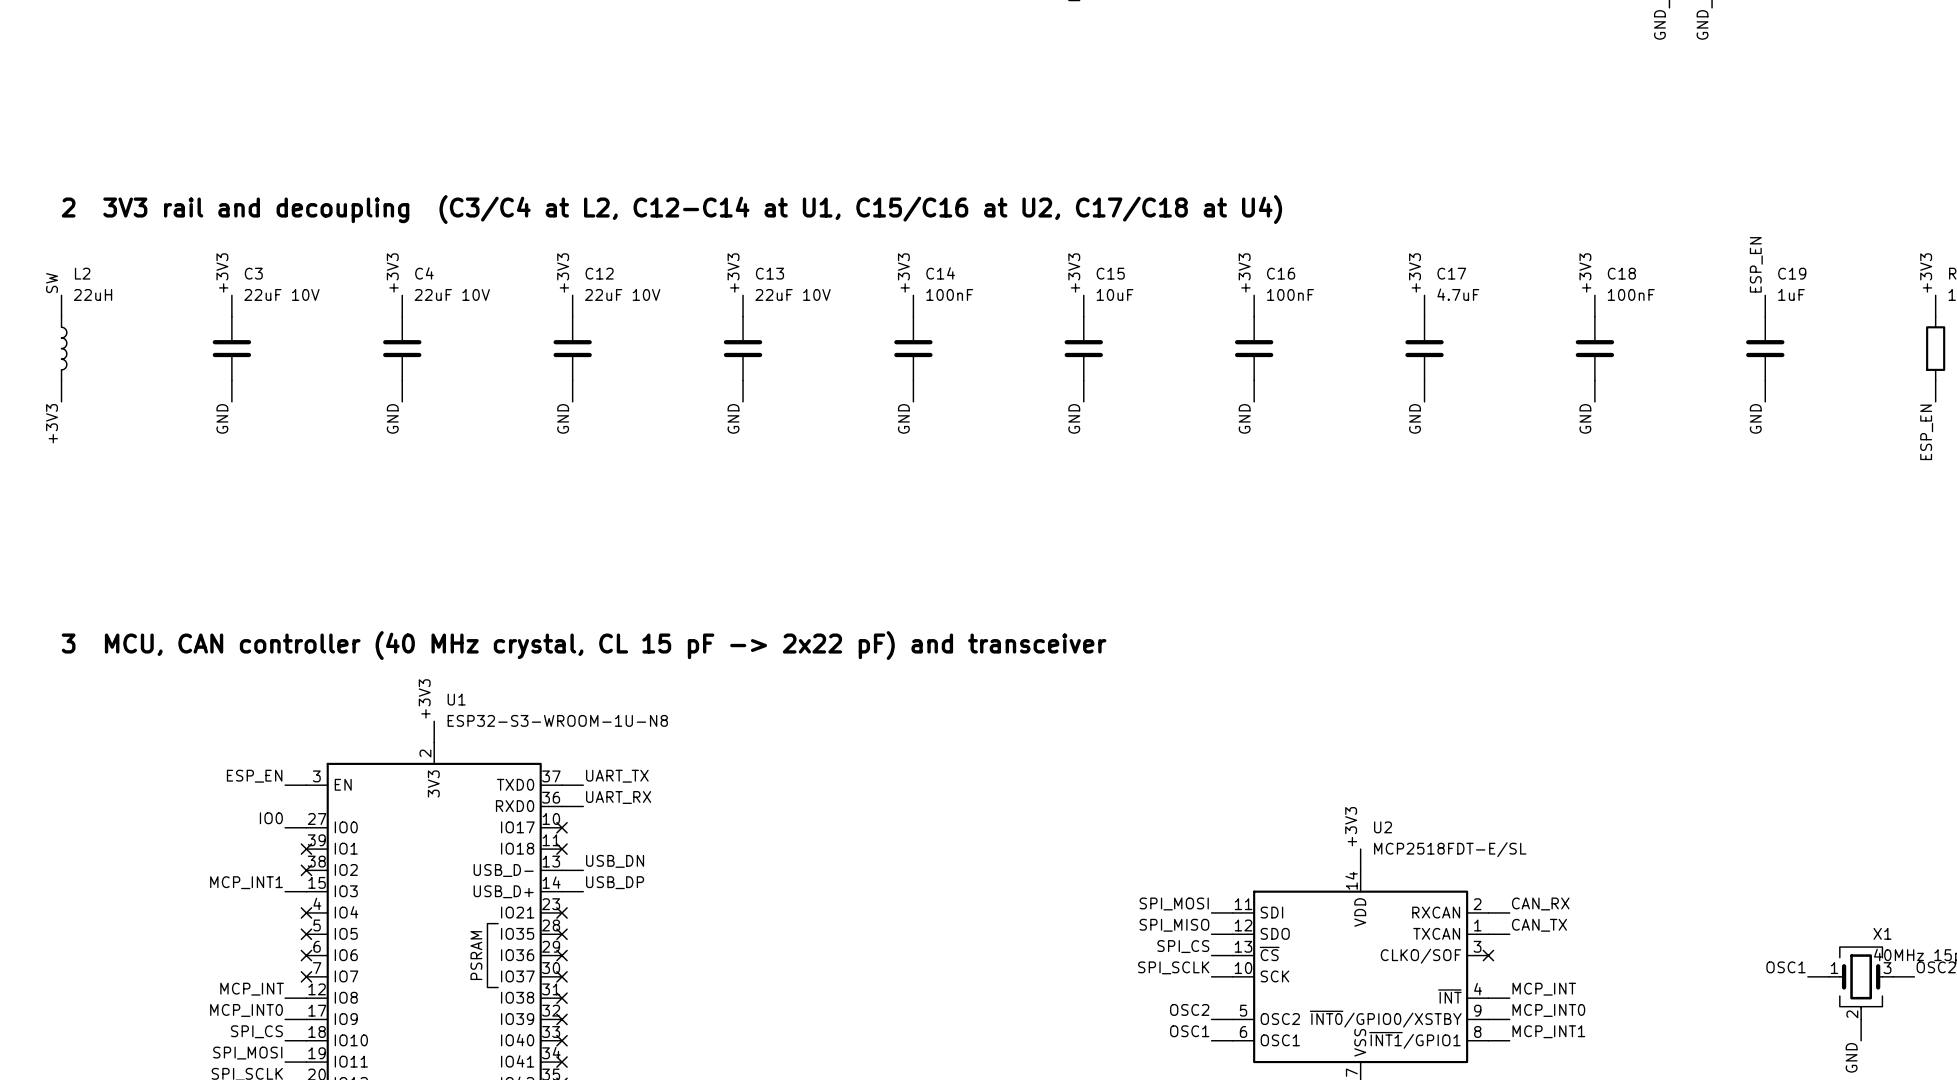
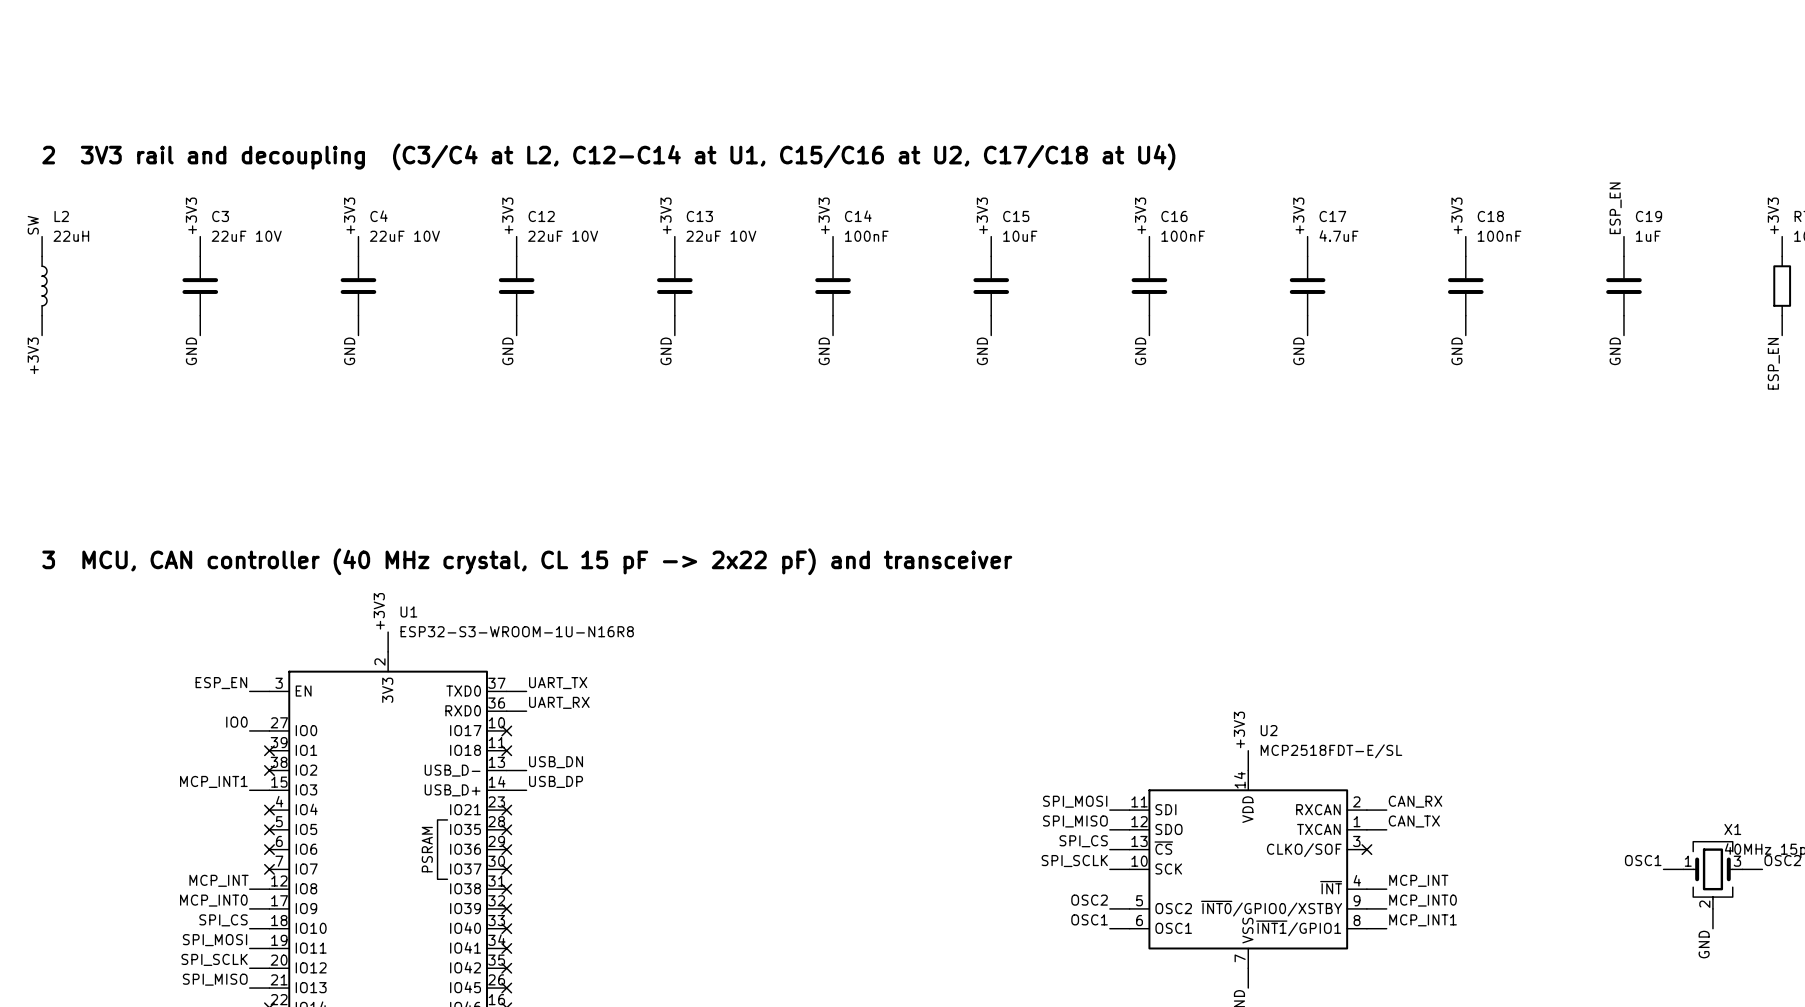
U1 value: ESP32-S3-WROOM-1U-N8 (557, 720) -> ESP32-S3-WROOM-1U-N16R8 (517, 631)

